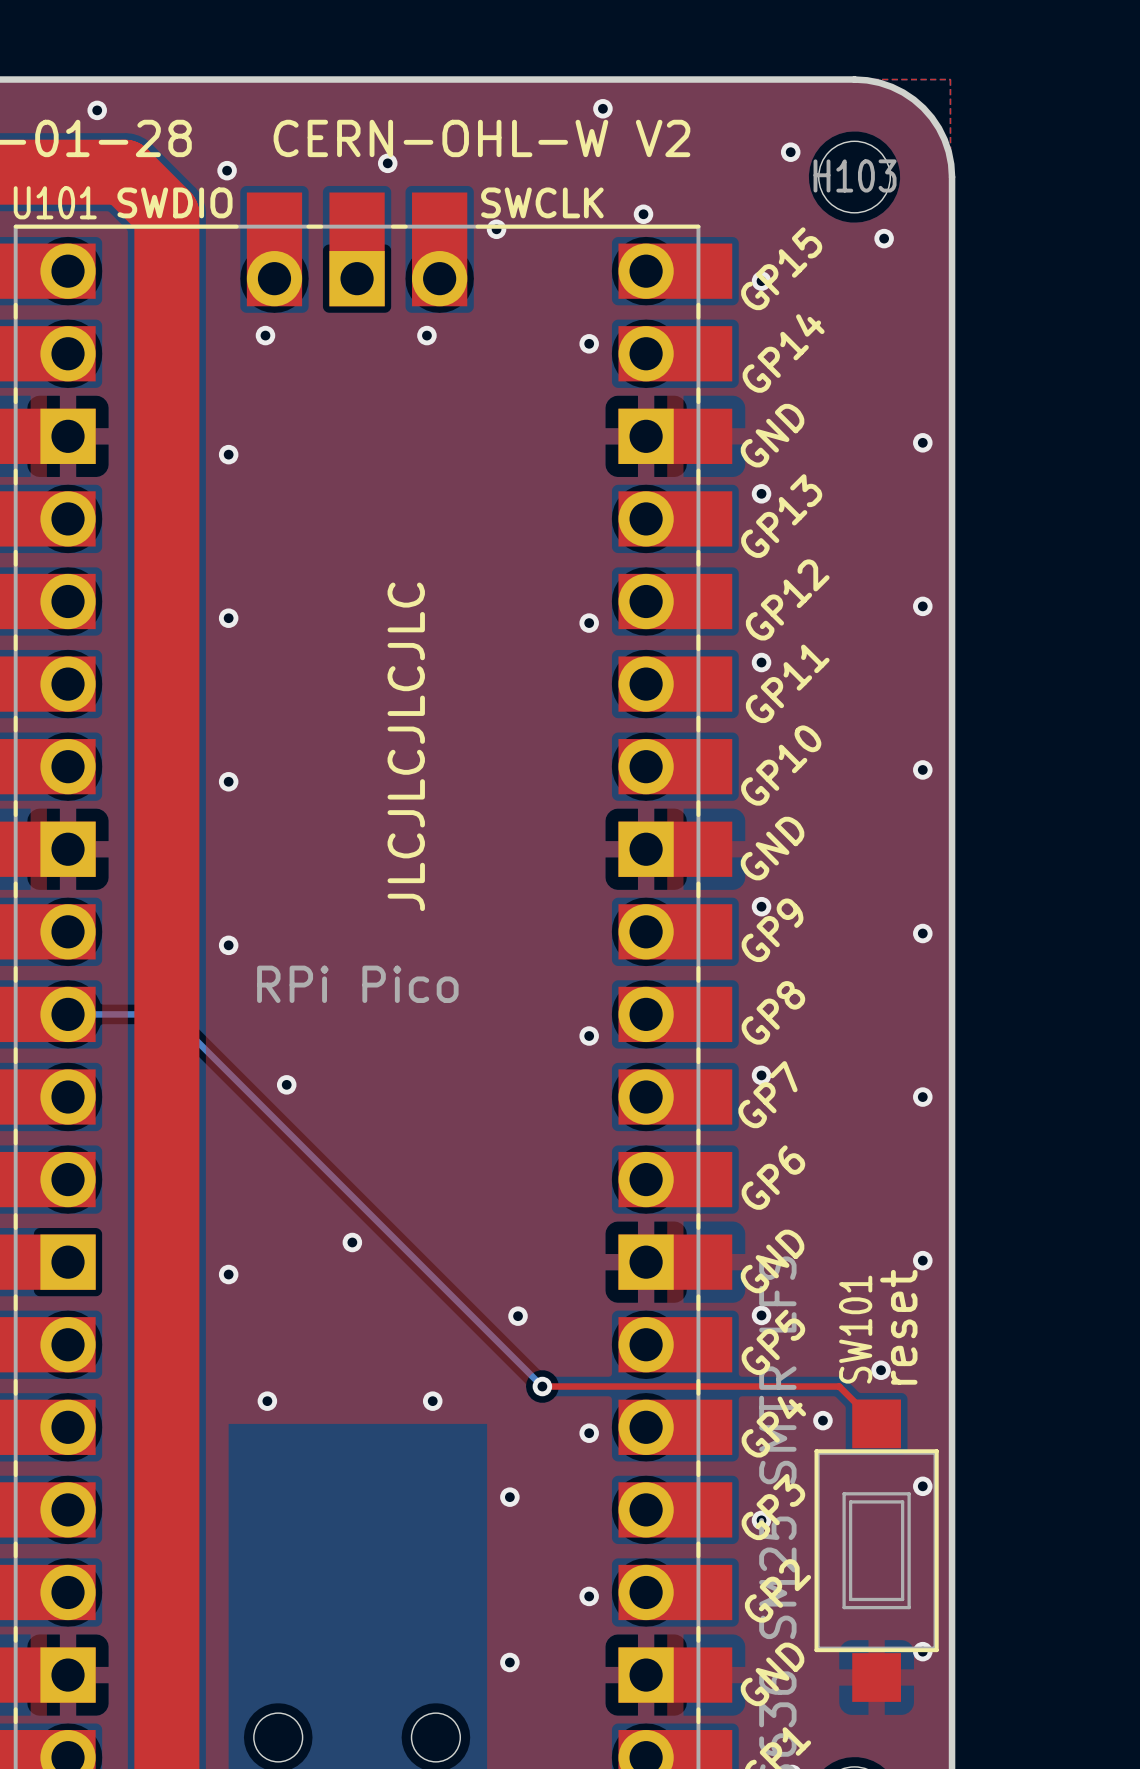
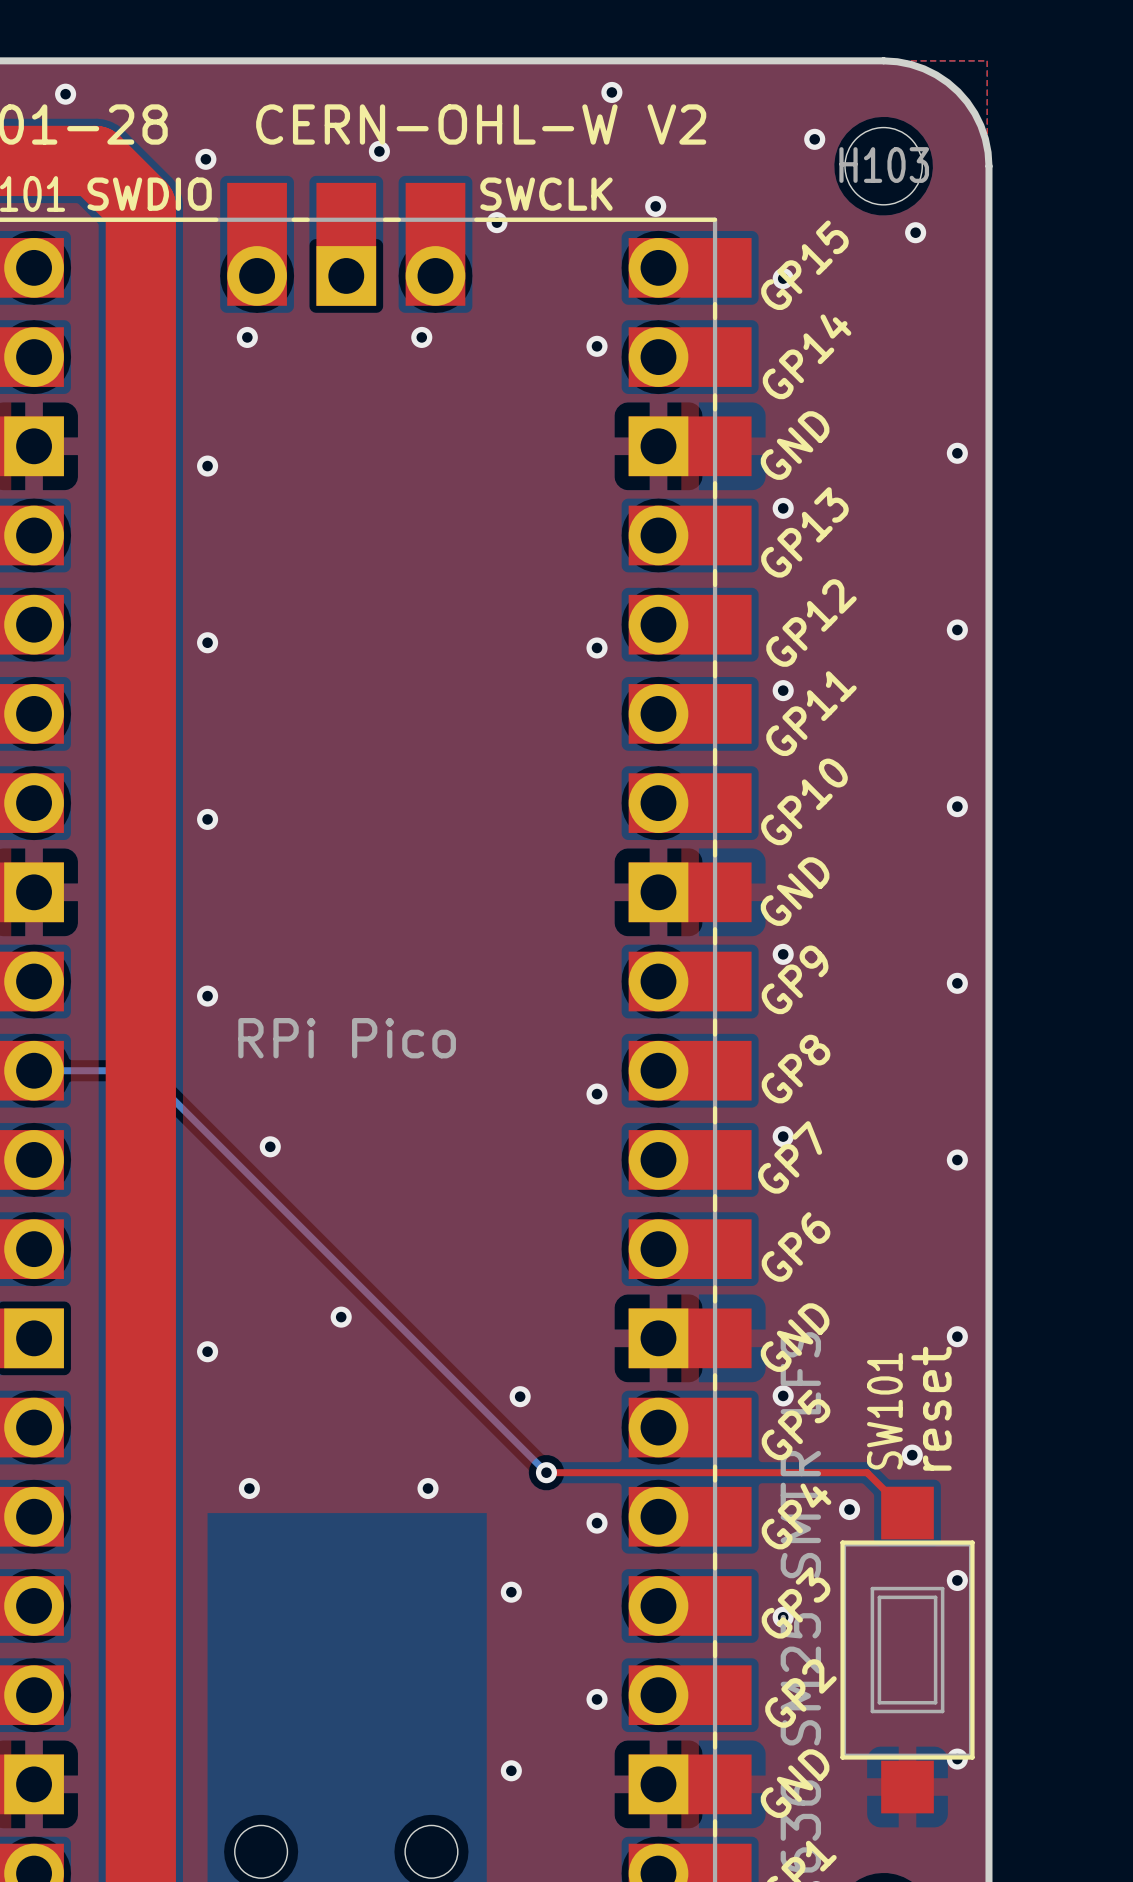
text: JLCJLCJLCJLC (406, 746) -> none

